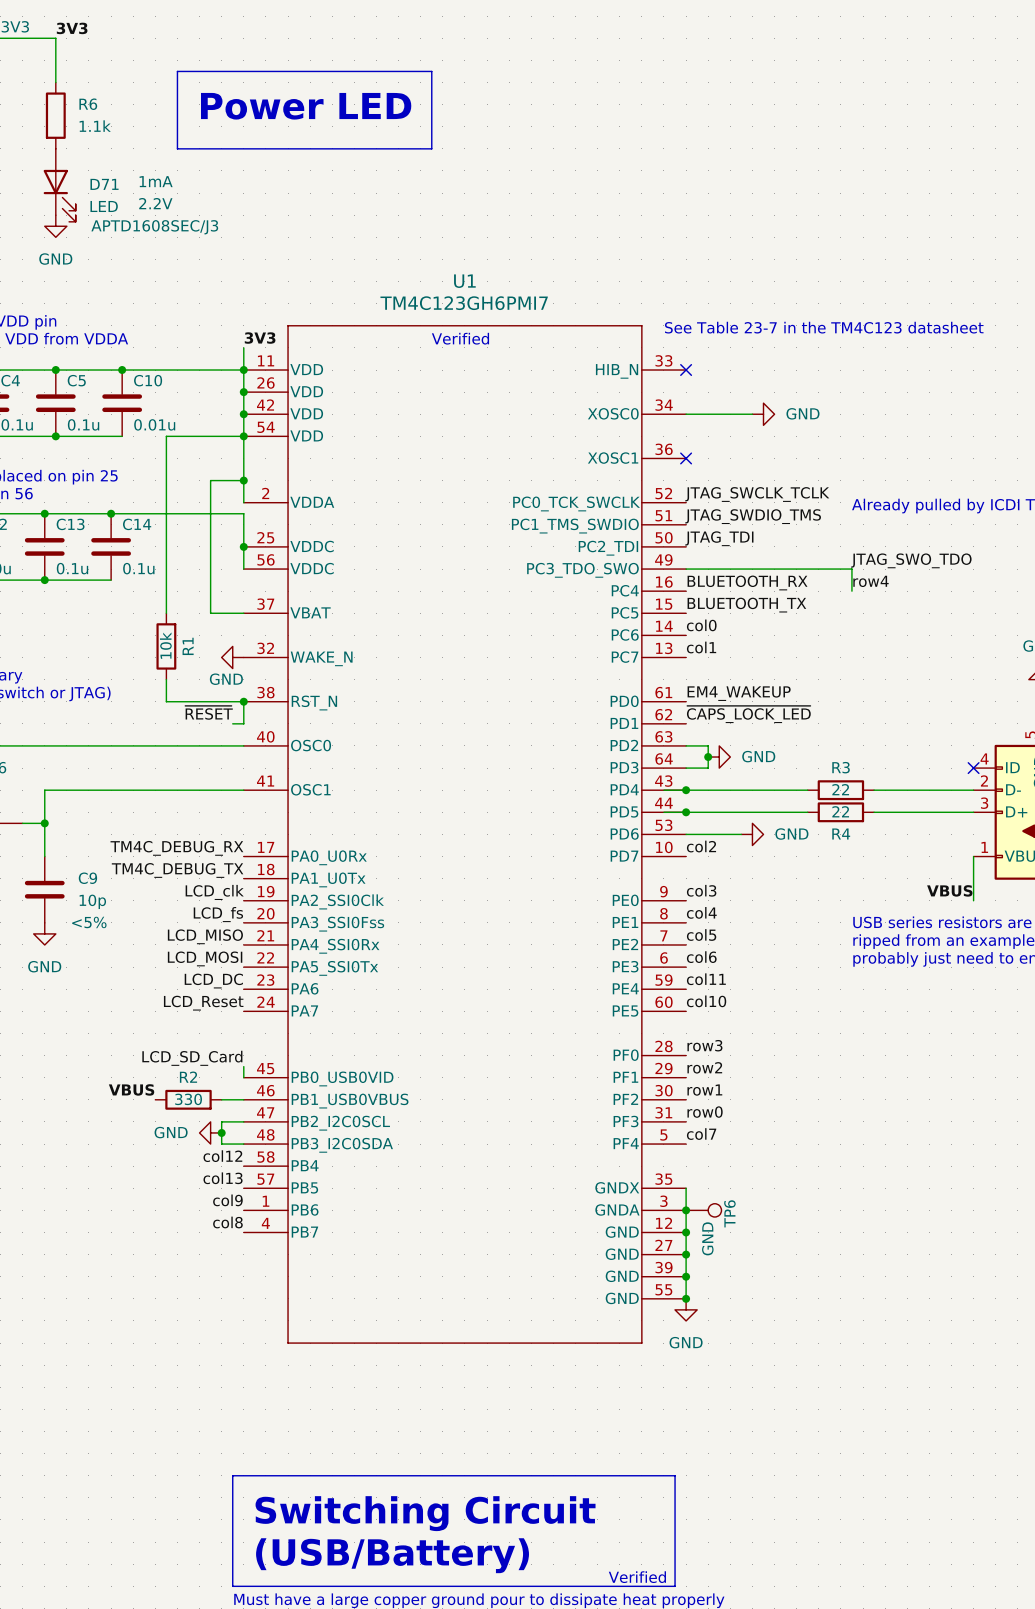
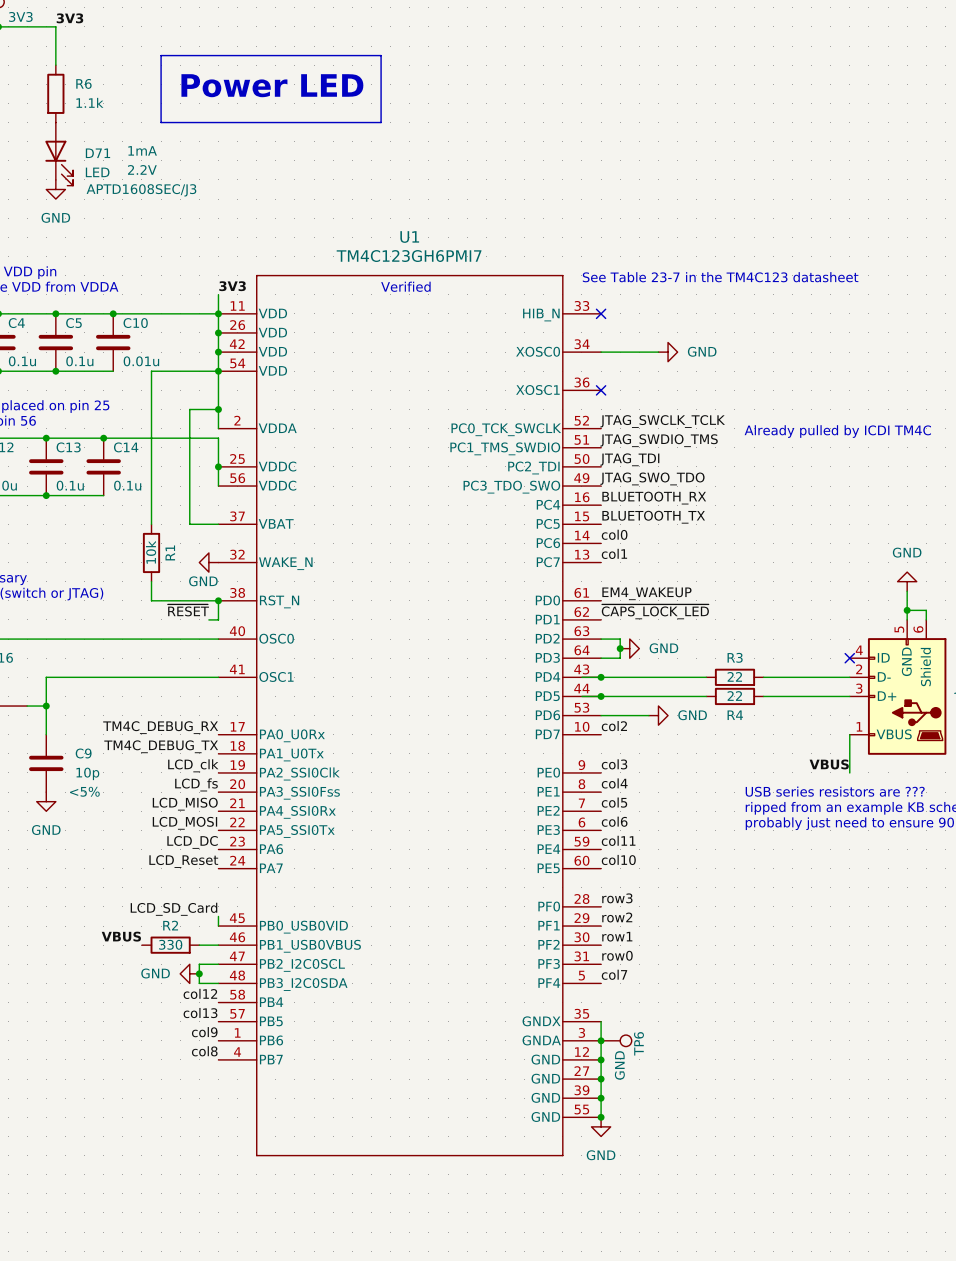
label position: JTAG_SWO_TDO (911, 560) -> JTAG_SWO_TDO (652, 478)
wire: (686, 569) (851, 569) (851, 591) -> none
label: row4 (871, 581) -> none

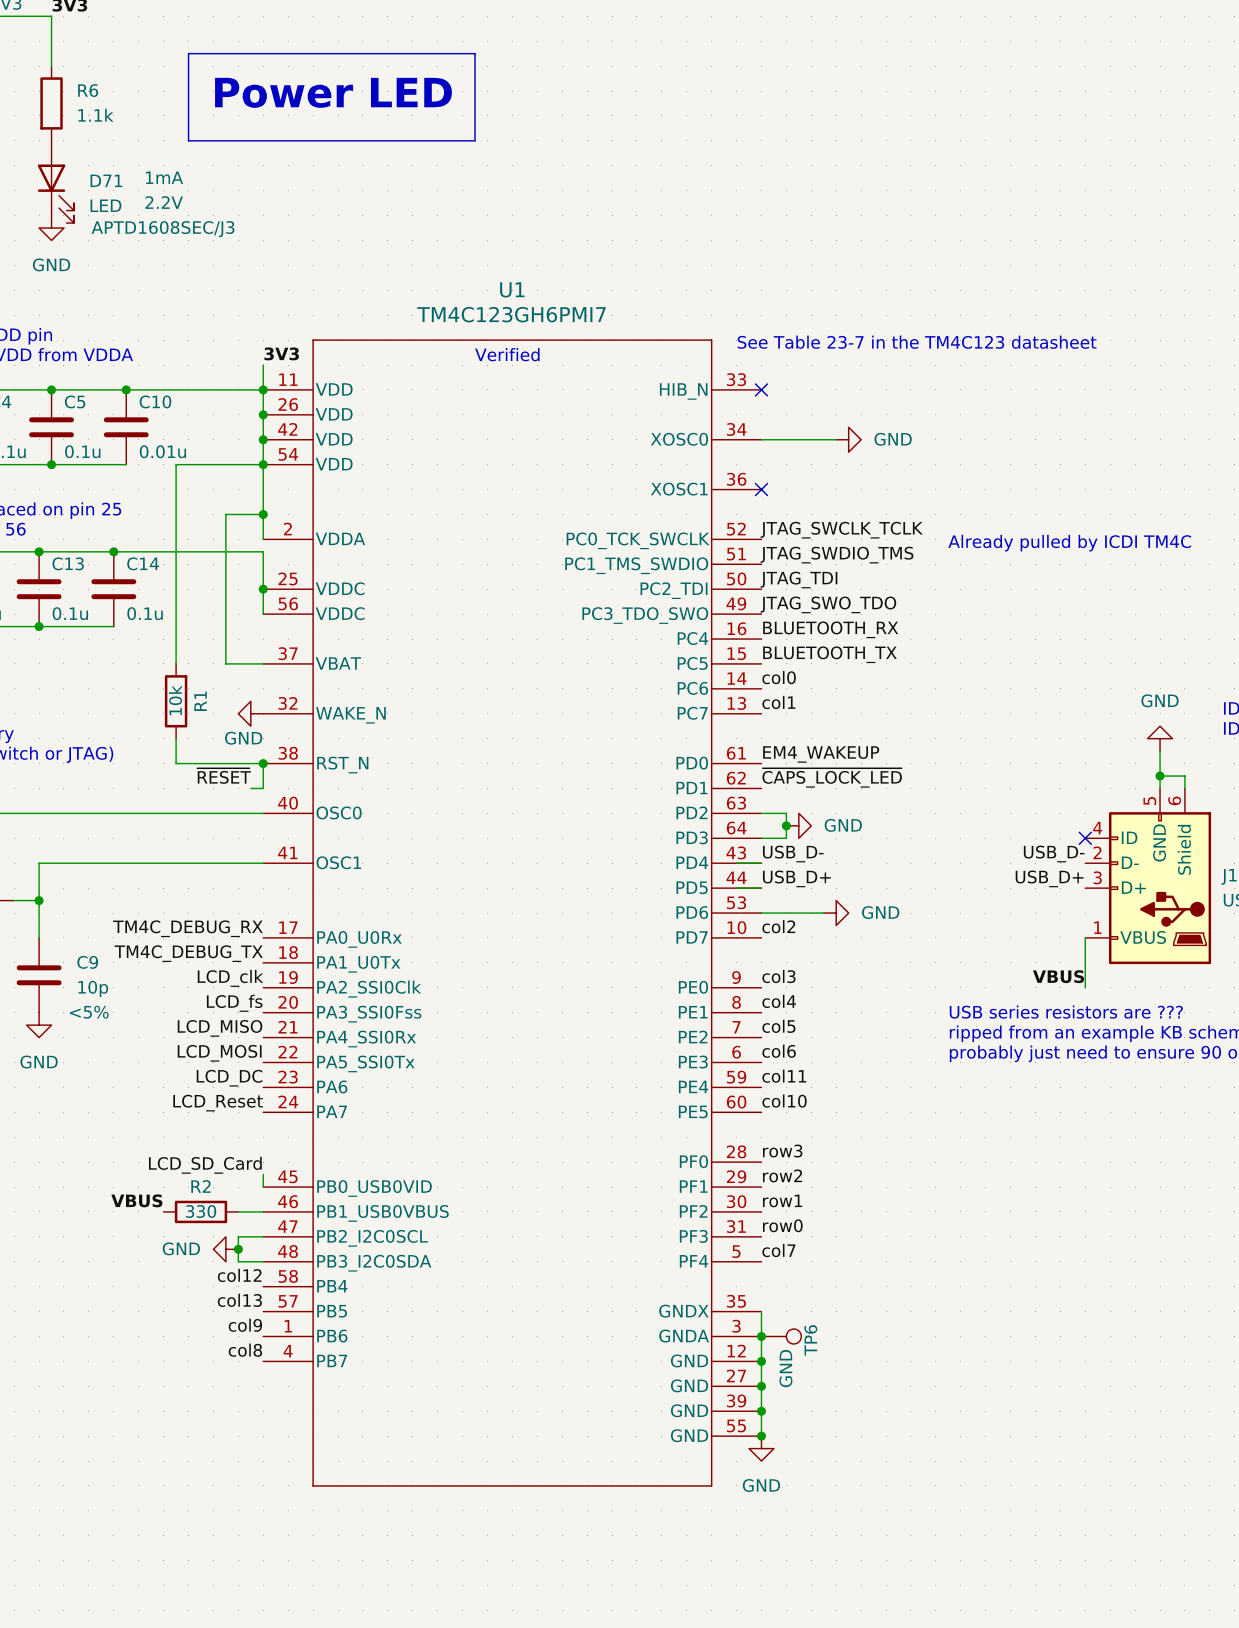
label: none -> USB_D- (793, 854)
label: none -> USB_D- (1054, 854)
wire: (601, 677) (706, 677) -> none
junction: (601, 677) -> none
R3: 22 (734, 677) -> none
wire: (763, 677) (849, 677) -> none
label: none -> USB_D+ (796, 878)
label: none -> USB_D+ (1049, 878)
wire: (601, 696) (706, 696) -> none
junction: (601, 696) -> none
R4: 22 (734, 696) -> none
wire: (763, 696) (849, 696) -> none

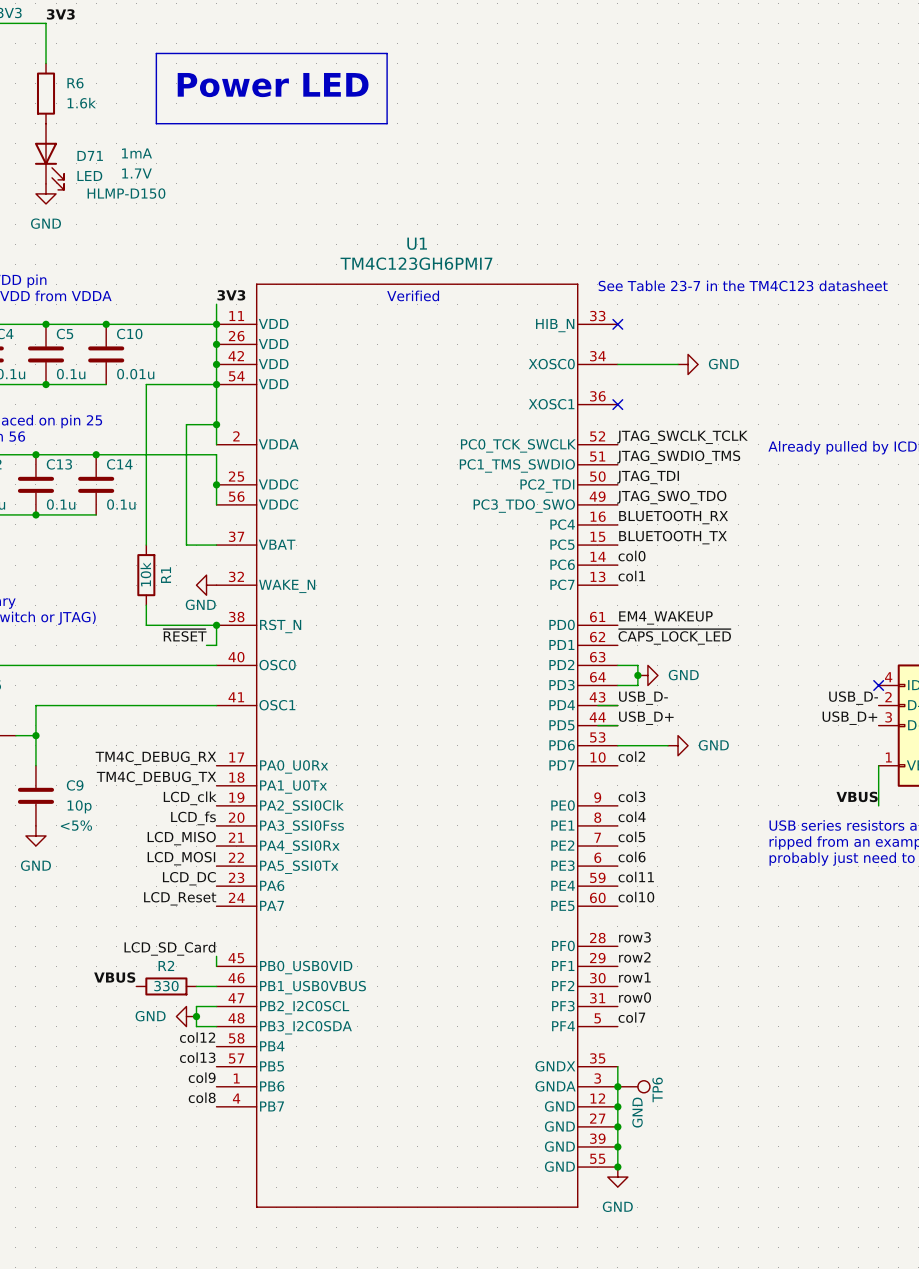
R6 value: 1.1k (95, 115) -> 1.6k (81, 103)
D71 text: 2.2V (164, 202) -> 1.7V (136, 173)
D71 text: APTD1608SEC/J3 (163, 229) -> HLMP-D150 (126, 193)

